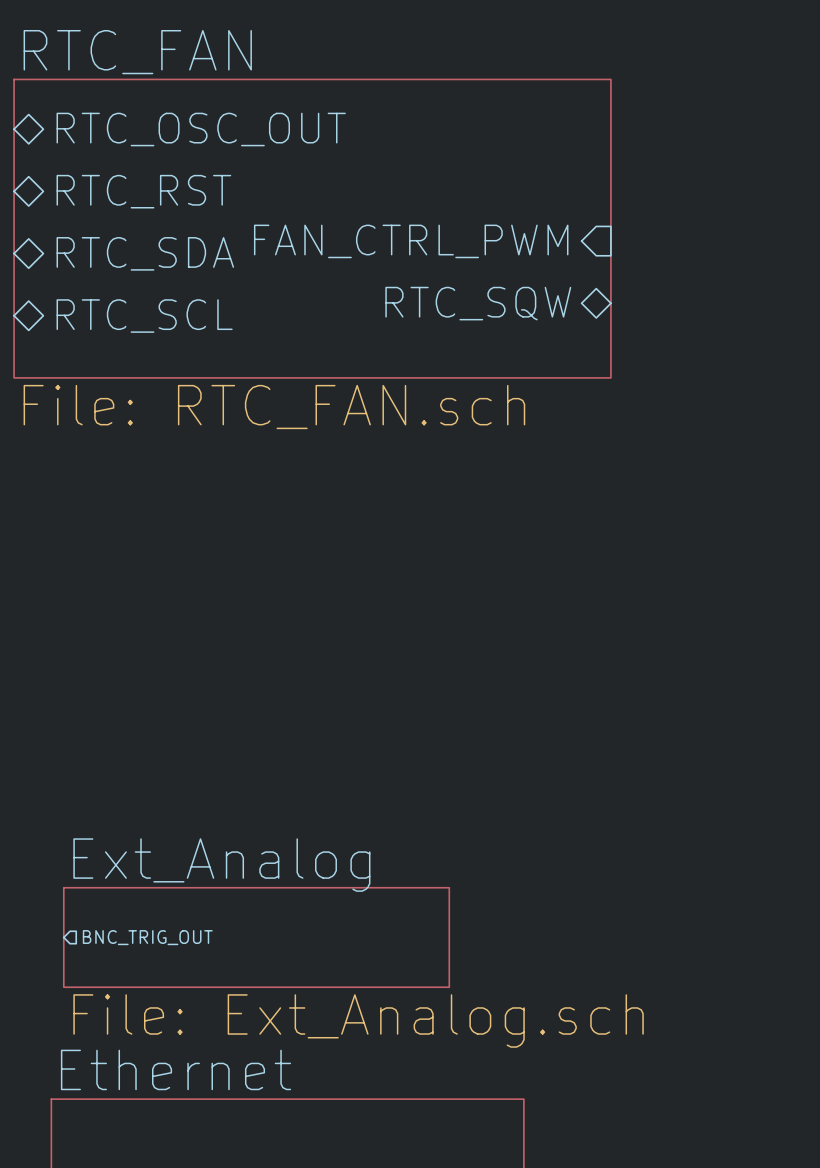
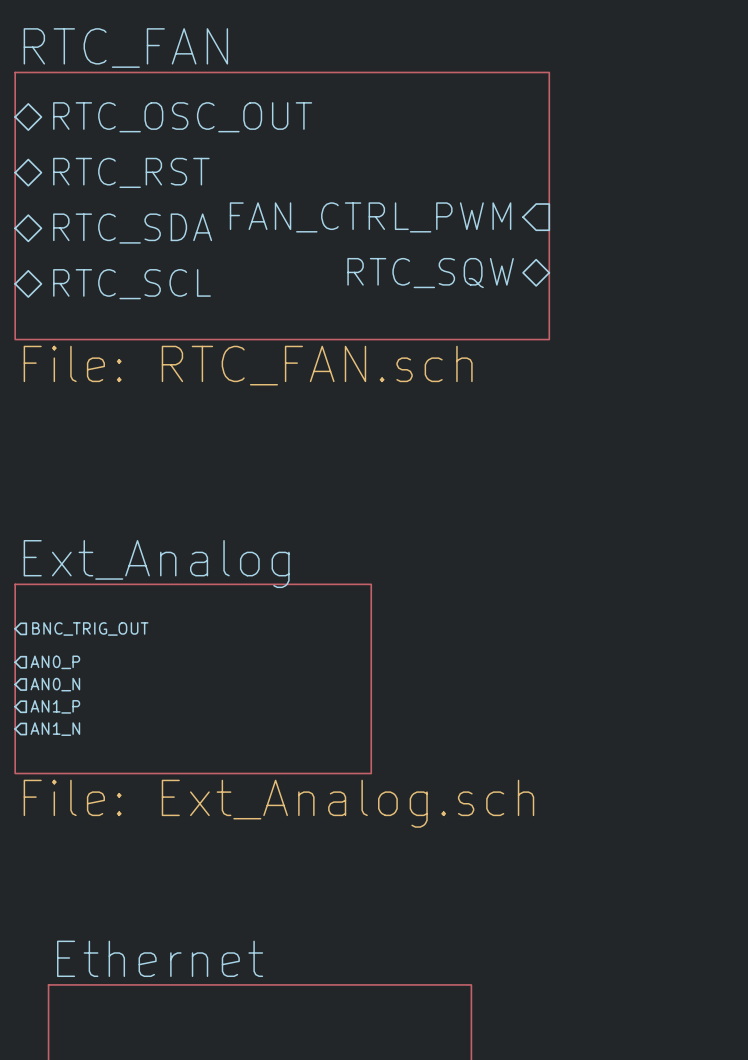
sheet pin: none -> AN0_P (55, 662)
sheet Ext_Analog: none -> File: Ext_Analog.sch (193, 678)
sheet pin: none -> AN0_N (55, 684)
sheet pin: none -> AN1_P (55, 706)
sheet pin: none -> AN1_N (55, 729)
sheet pin position: BNC_TRIG_OUT (147, 937) -> BNC_TRIG_OUT (90, 628)
sheet Ext_Analog: File: Ext_Analog.sch (256, 937) -> none

